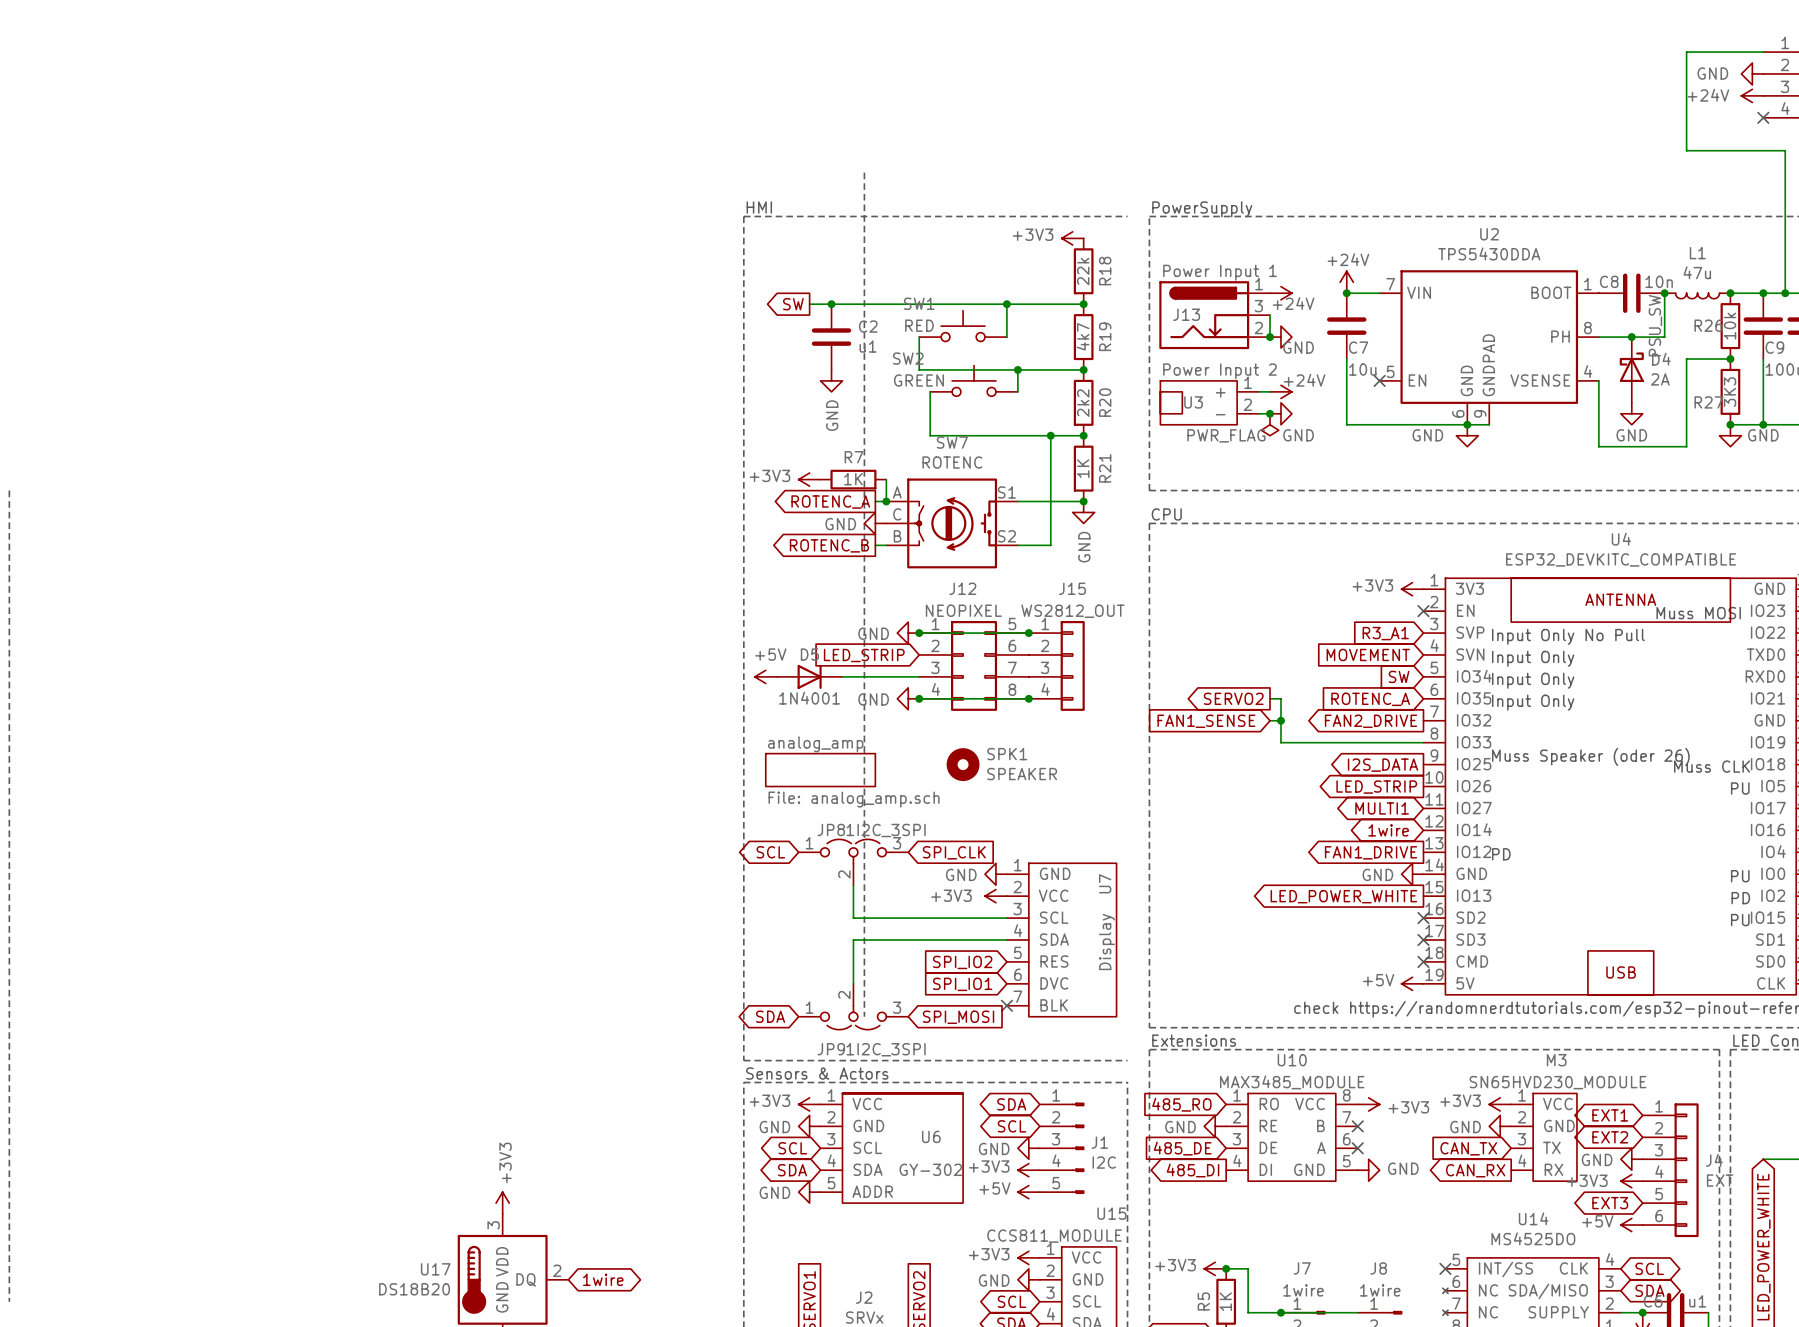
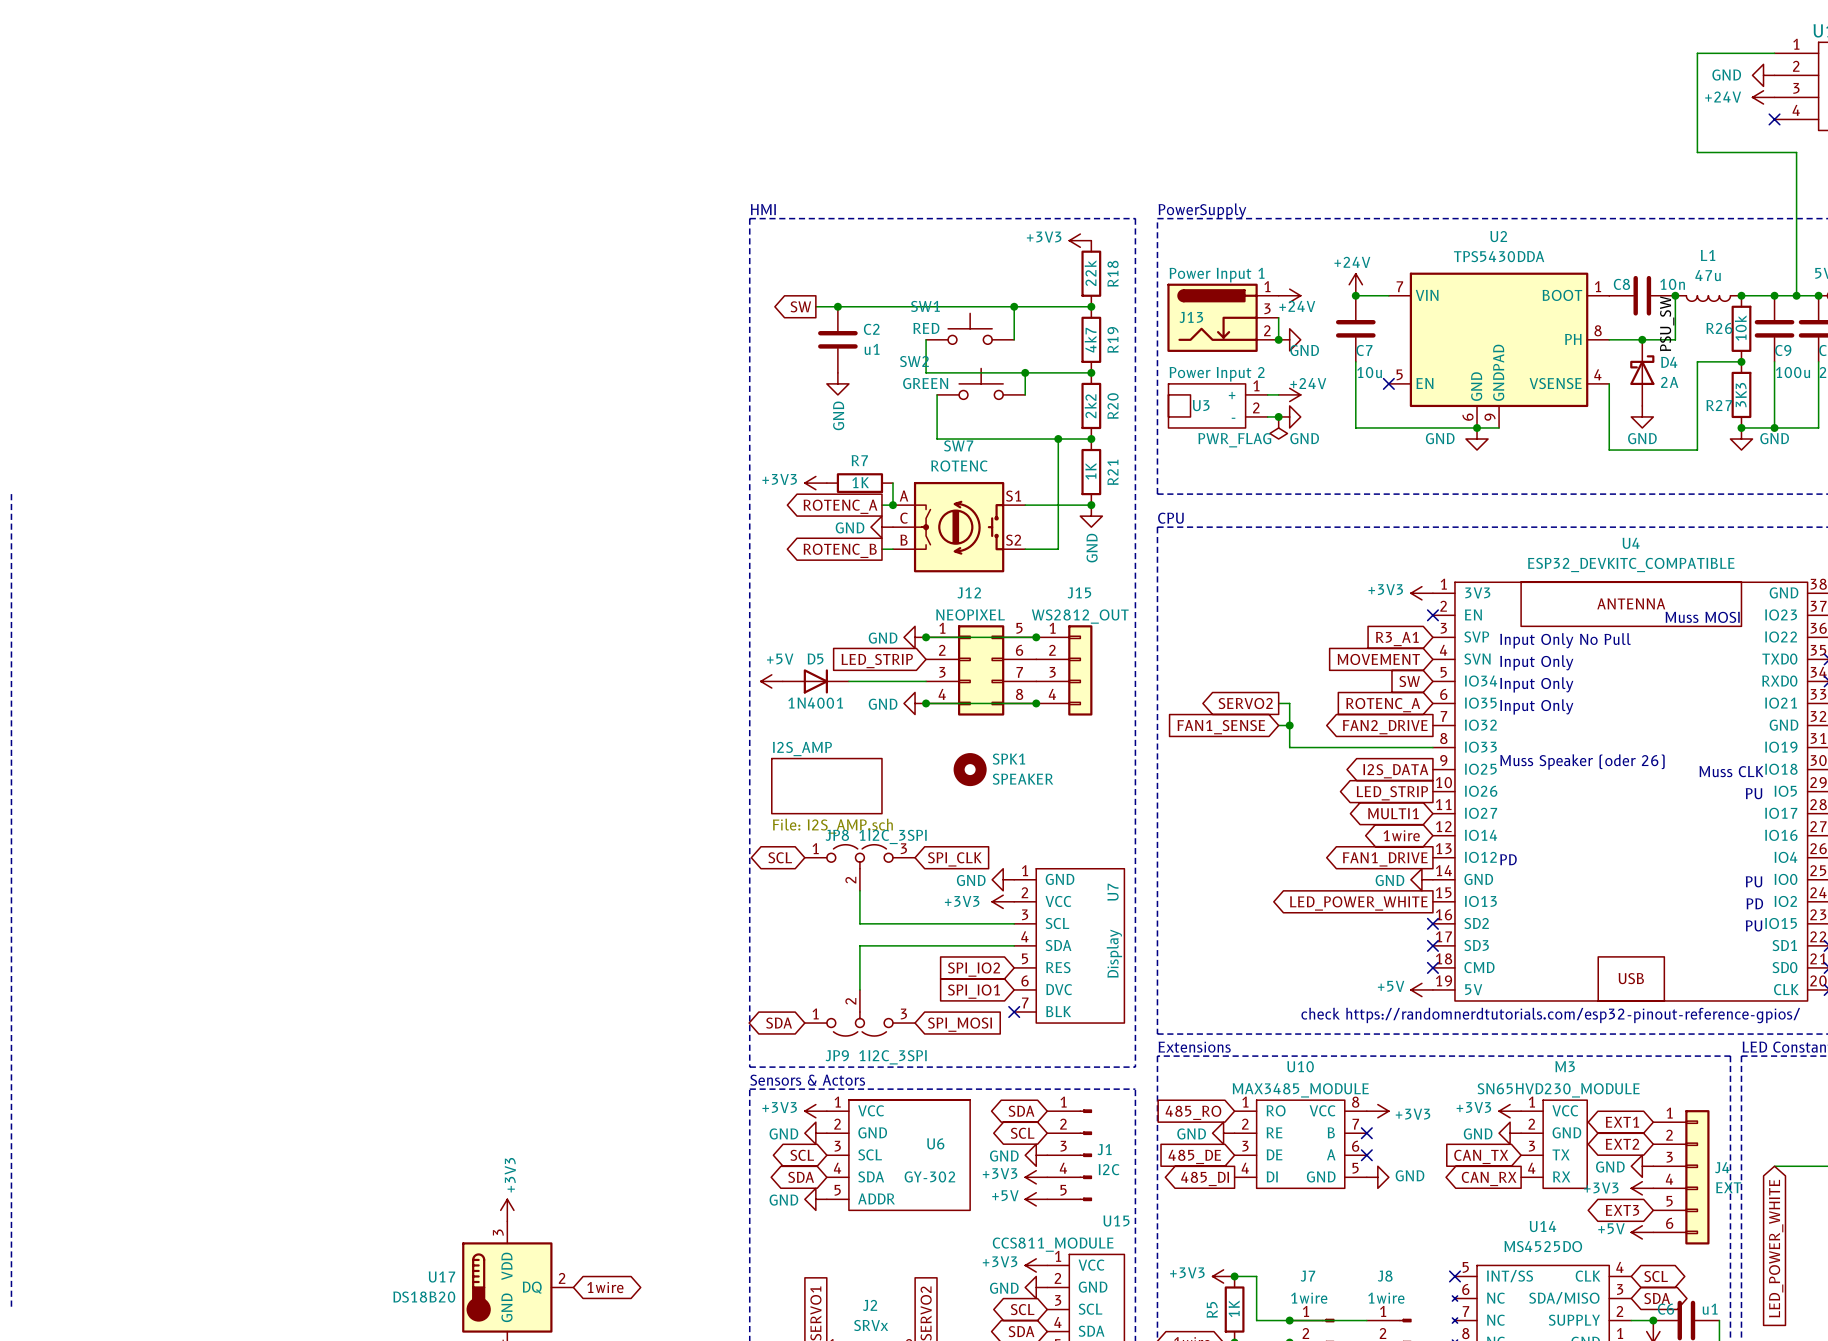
line: (864, 172) (864, 1016) -> none
line: none -> (1135, 218) (1135, 1067)
sheet analog_amp: File: analog_amp.sch (820, 770) -> none
sheet I2S_AMP: none -> File: I2S_AMP.sch (826, 786)

